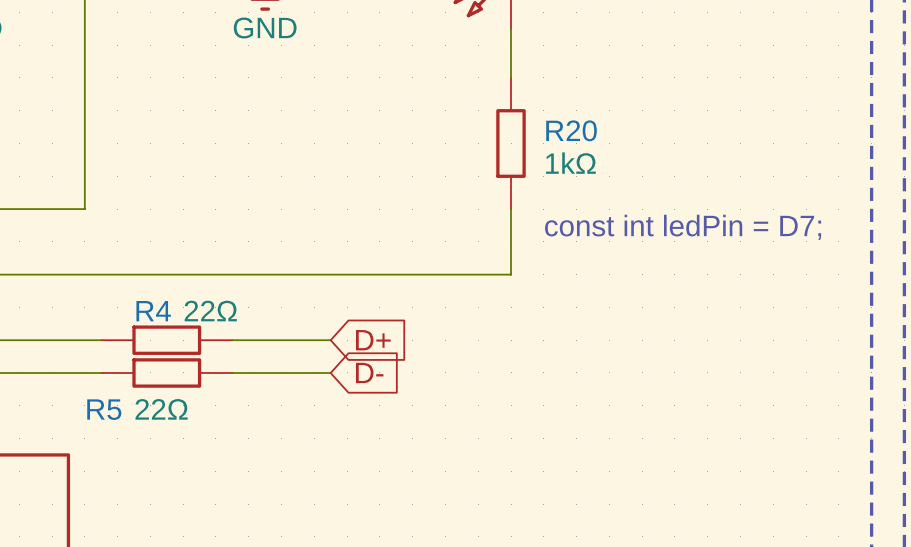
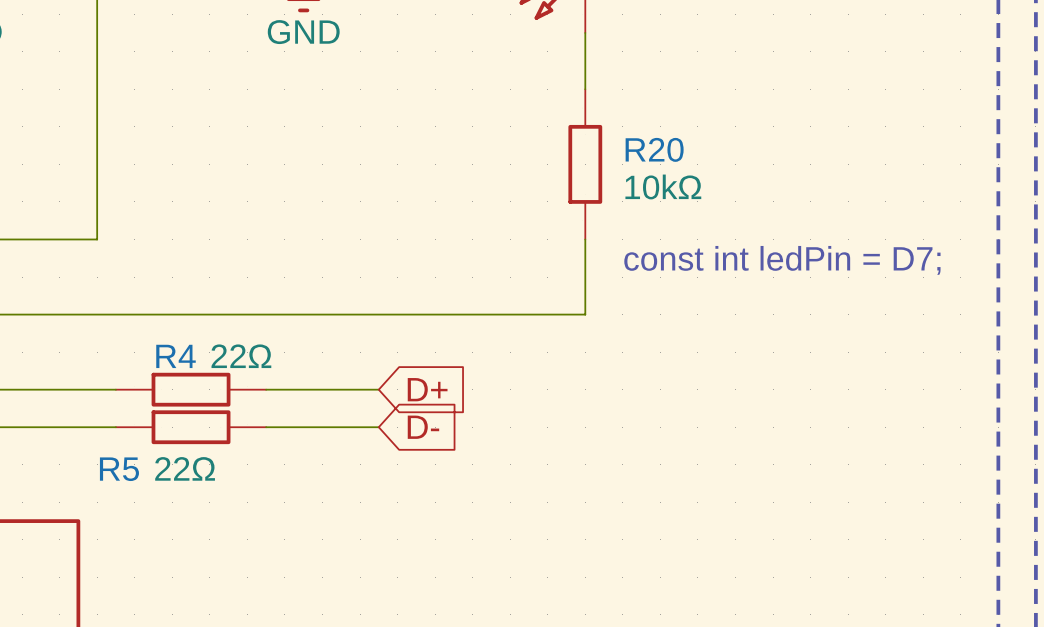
R20 value: 1kΩ (570, 163) -> 10kΩ (663, 186)

